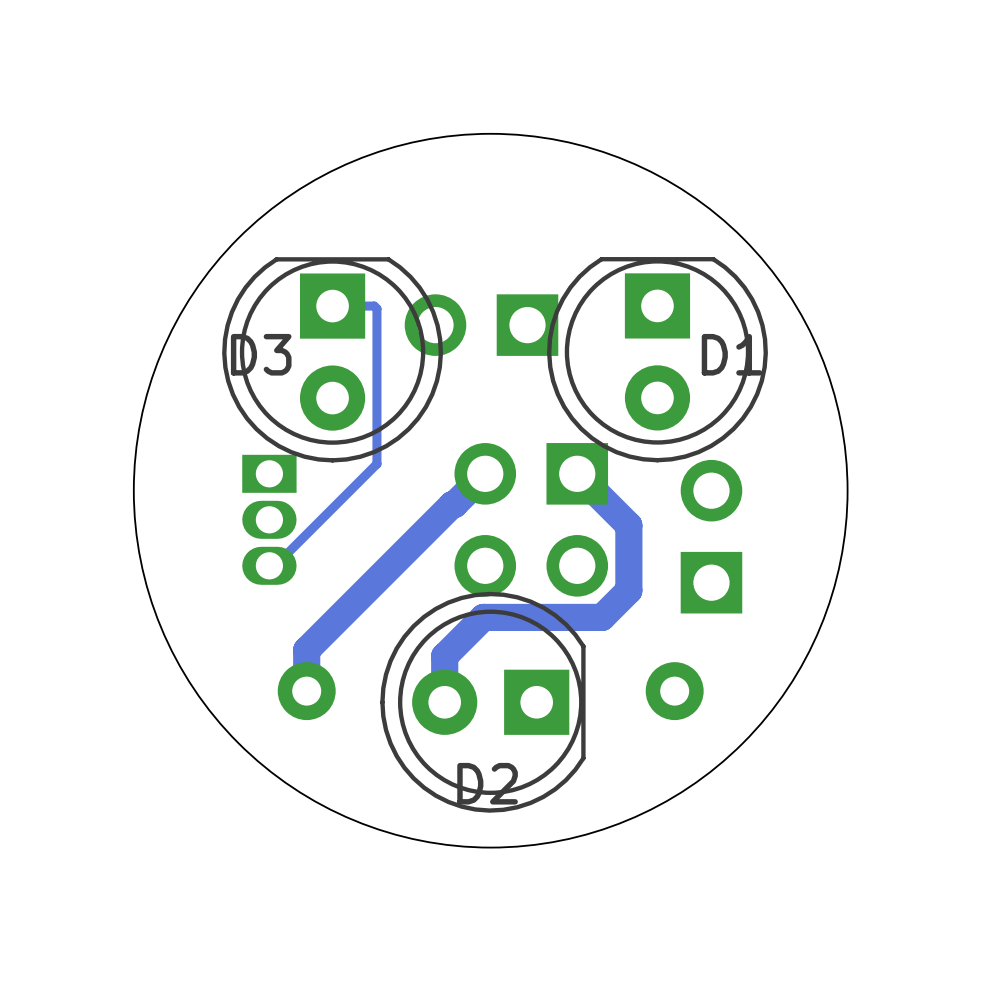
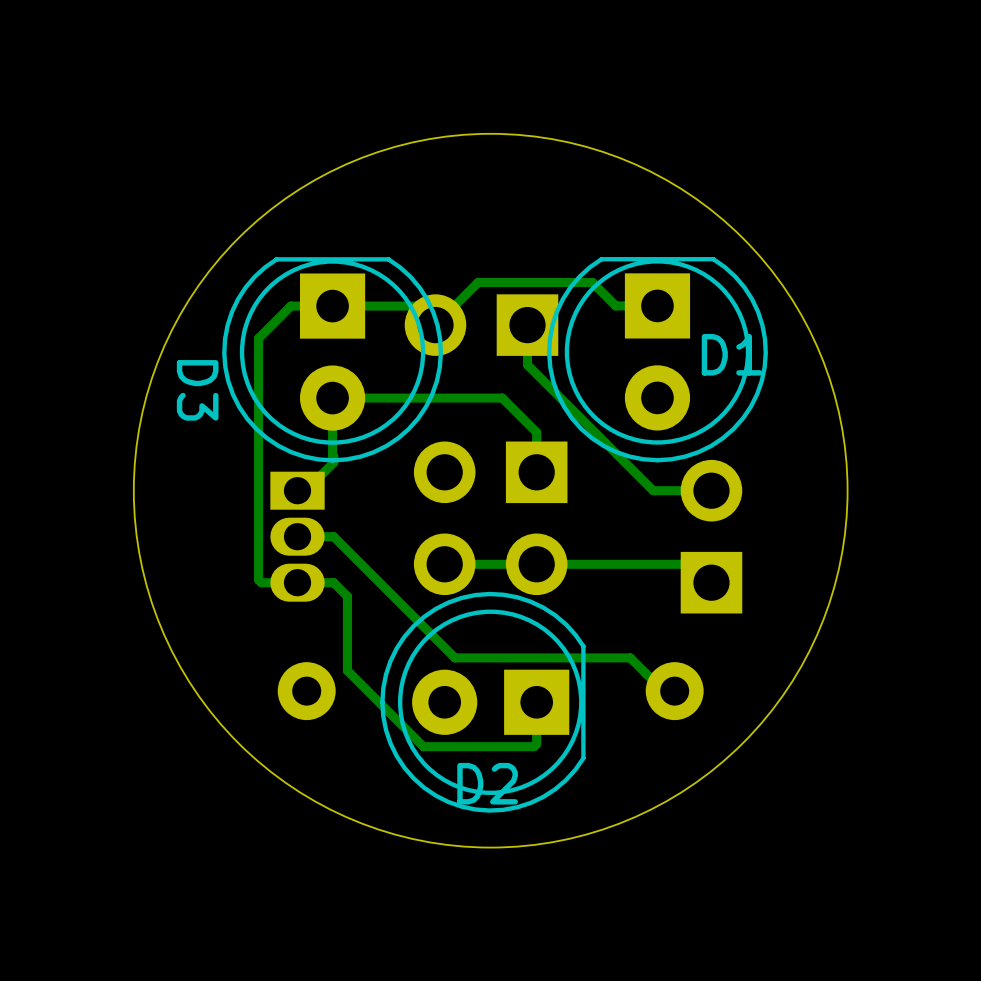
track: none -> (332, 306) (290, 306) (258, 338) (258, 579) (261, 582) (333, 582) (347, 596) (347, 670) (423, 746) (533, 746) (536, 743) (536, 702)
track: (374, 306) (376, 308) (376, 463) (275, 565) (269, 565) -> (374, 306) (416, 306) (435, 325) (478, 282) (592, 282) (615, 305) (657, 305)
track: none -> (527, 325) (527, 364) (653, 490) (711, 490)
D3 name rotation: 0° (261, 354) -> 90° clockwise (197, 390)
track: none -> (536, 472) (536, 432) (502, 398) (332, 398) (333, 462) (305, 490) (297, 490)
track: (485, 473) (306, 650) (306, 691) -> none
track: (577, 473) (628, 525) (628, 590) (602, 617) (483, 617) (444, 656) (444, 702) -> none
part position: (269, 519) -> (297, 536)
part position: (531, 519) -> (490, 518)
track: none -> (297, 536) (333, 536) (454, 657) (630, 657) (674, 702)
track: none -> (444, 564) (693, 564) (711, 582)

